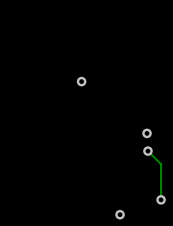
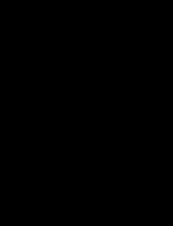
via: (81, 81) -> none
via: (147, 133) -> none
track: (147, 151) (161, 164) (161, 199) -> none
via: (147, 151) -> none
via: (161, 199) -> none
via: (120, 214) -> none

